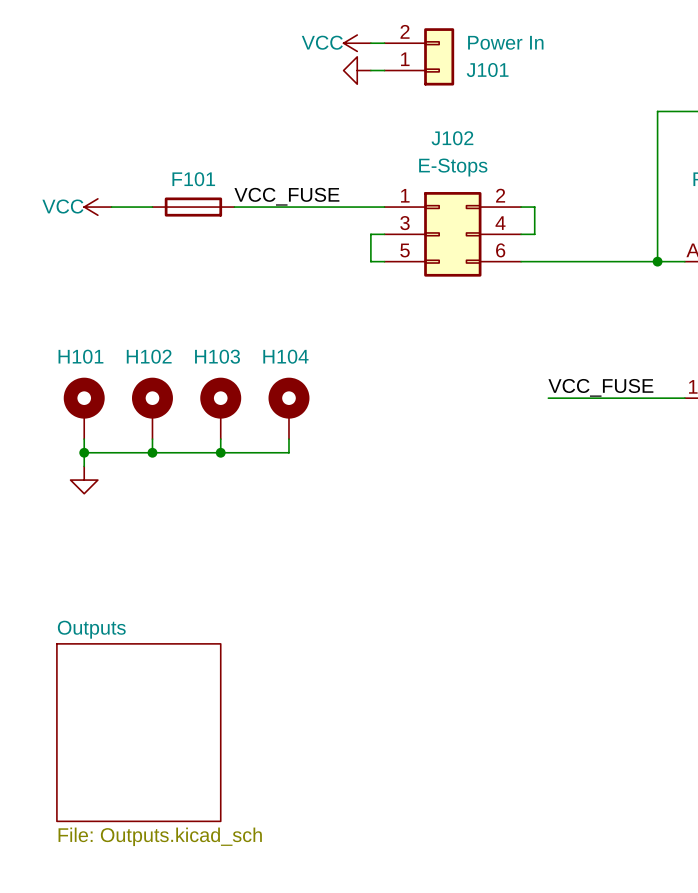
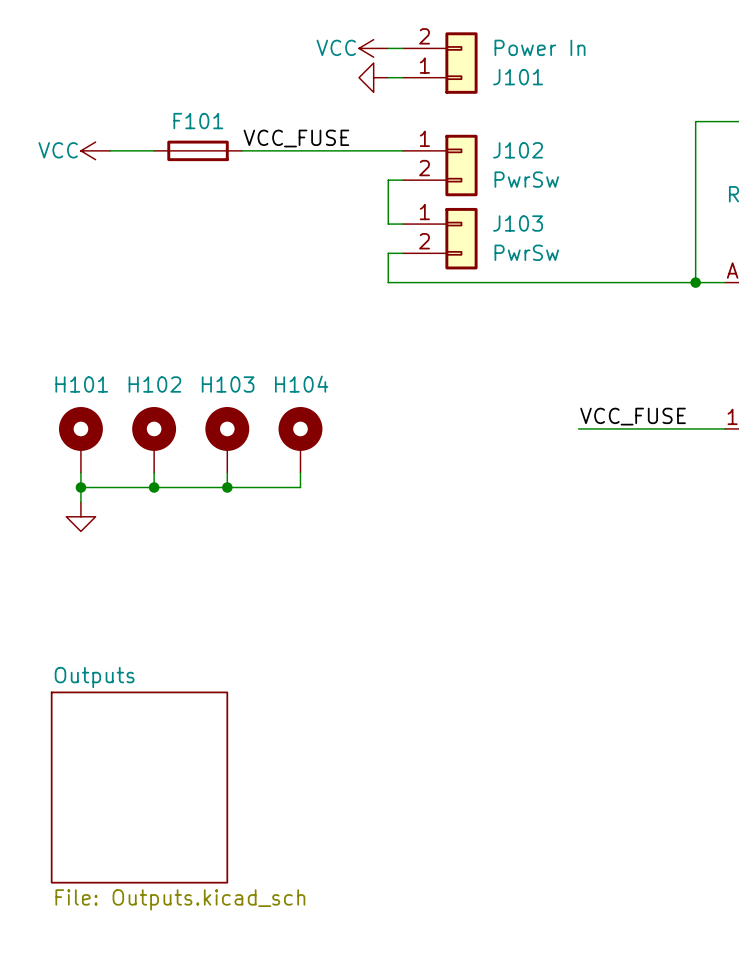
wire: none -> (241, 150) (402, 150)
J102 name position: J102 (452, 138) -> J102 (518, 150)
J102 value: E-Stops (453, 167) -> PwrSw (526, 179)
J102 symbol: [384, 192, 522, 277] -> [402, 134, 478, 197]
label position: VCC_FUSE (286, 196) -> VCC_FUSE (296, 138)
power symbol position: VCC (97, 207) -> VCC (95, 150)
wire: (111, 207) (152, 207) -> (110, 150) (154, 150)
F101 position: (193, 207) -> (198, 150)
wire: (234, 207) (370, 207) -> (402, 180) (388, 180) (388, 224)
wire: (521, 207) (534, 207) (534, 234) (521, 234) -> none
J103: none -> PwrSw (440, 238)

